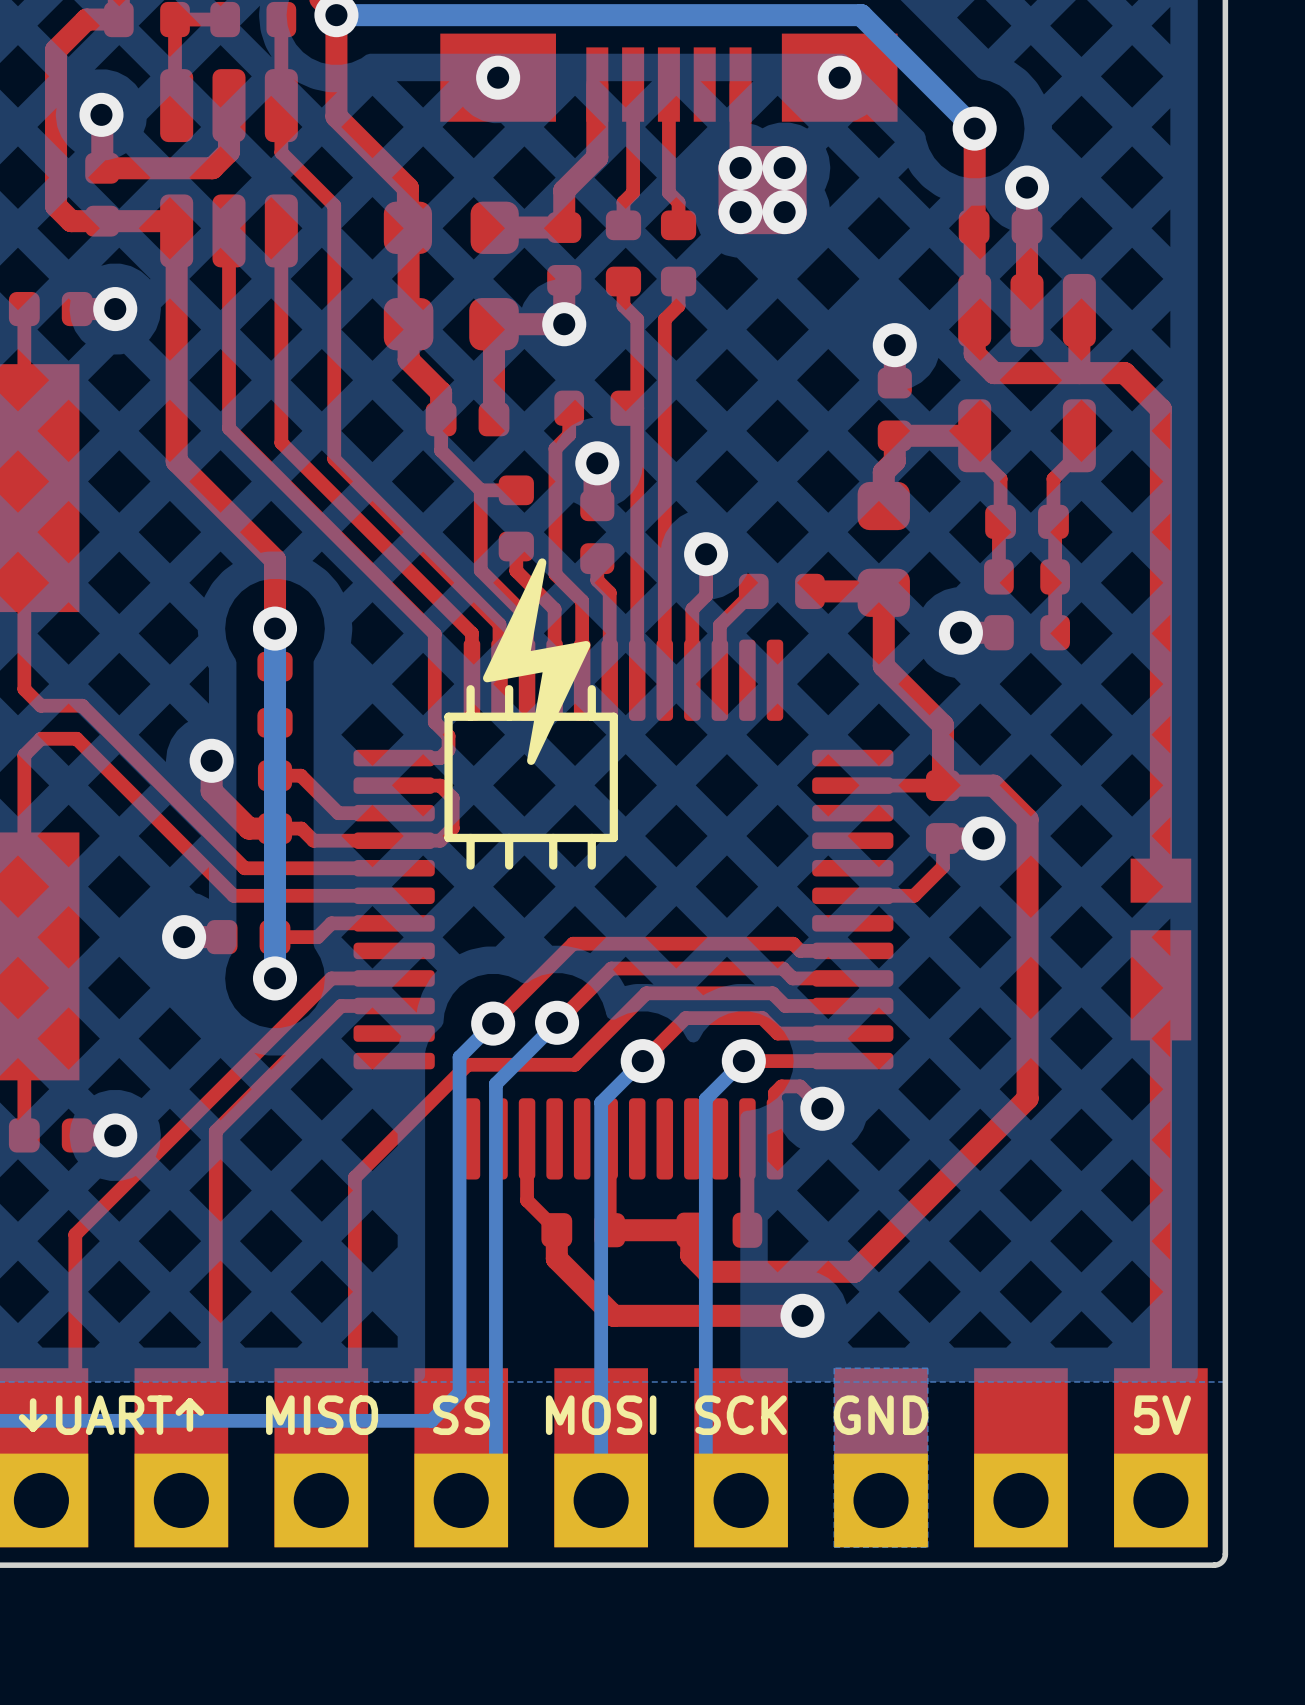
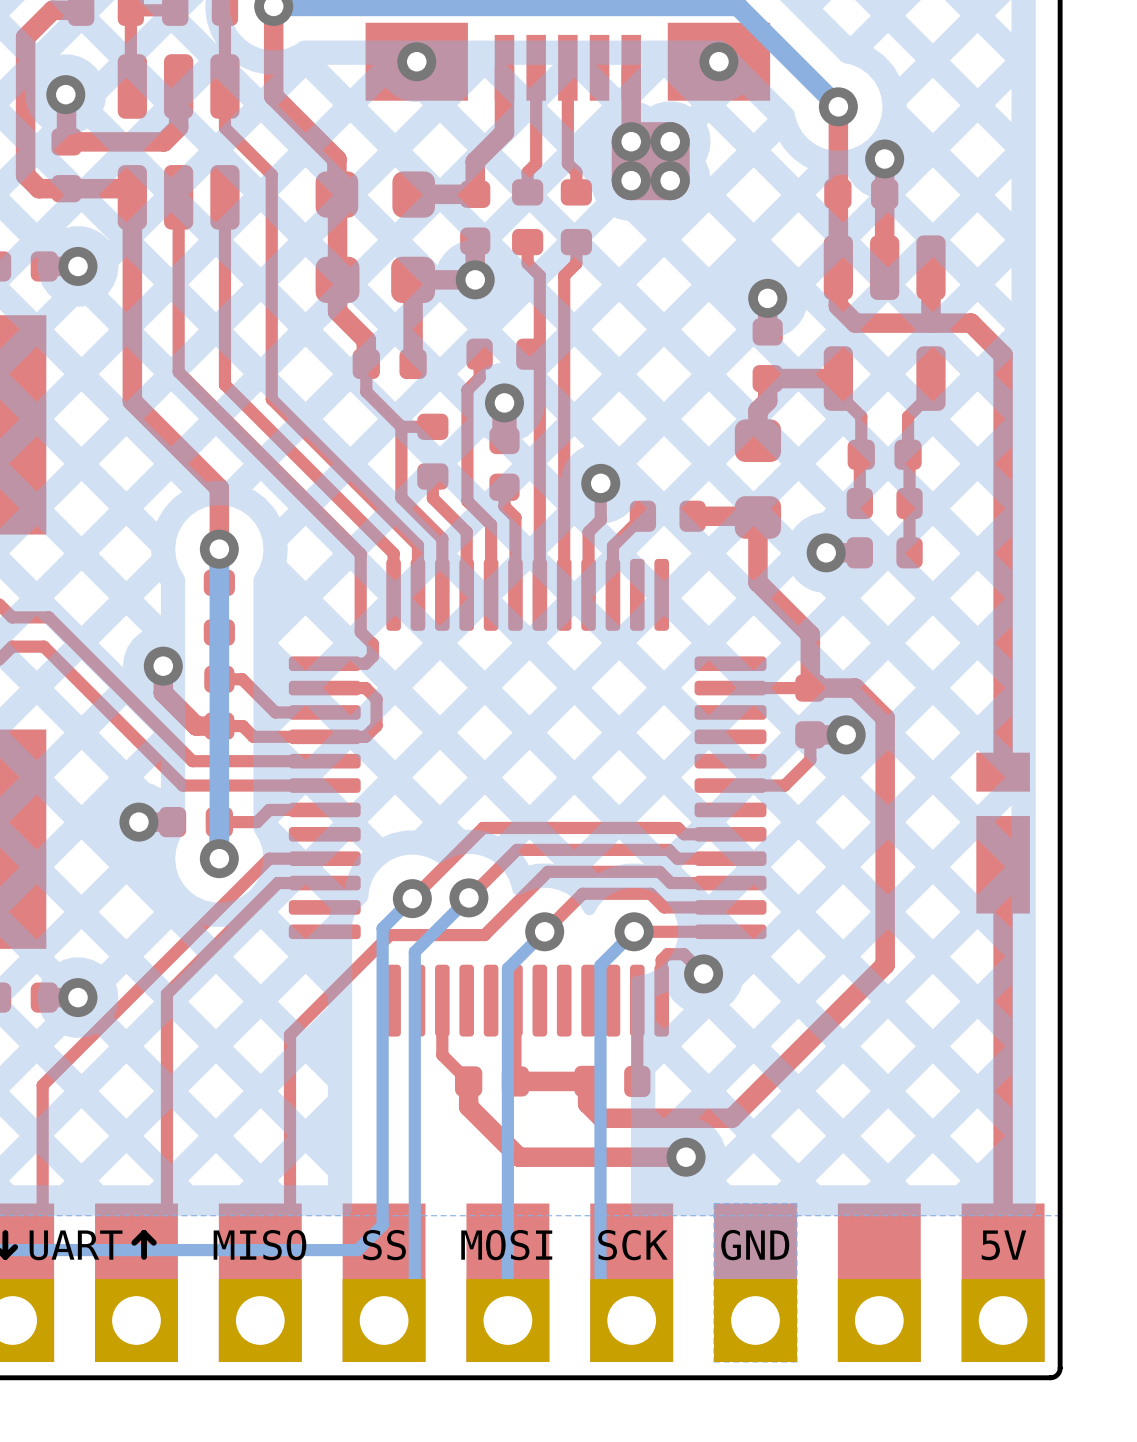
drawing: [482, 558, 591, 765] -> none
line: (470, 689) (470, 716) -> none
line: (509, 689) (509, 716) -> none
line: (591, 689) (591, 716) -> none
line: (613, 716) (448, 716) (448, 837) (613, 837) (613, 716) -> none
line: (470, 837) (470, 865) -> none
line: (509, 837) (509, 865) -> none
line: (553, 837) (553, 865) -> none
line: (591, 837) (591, 865) -> none

